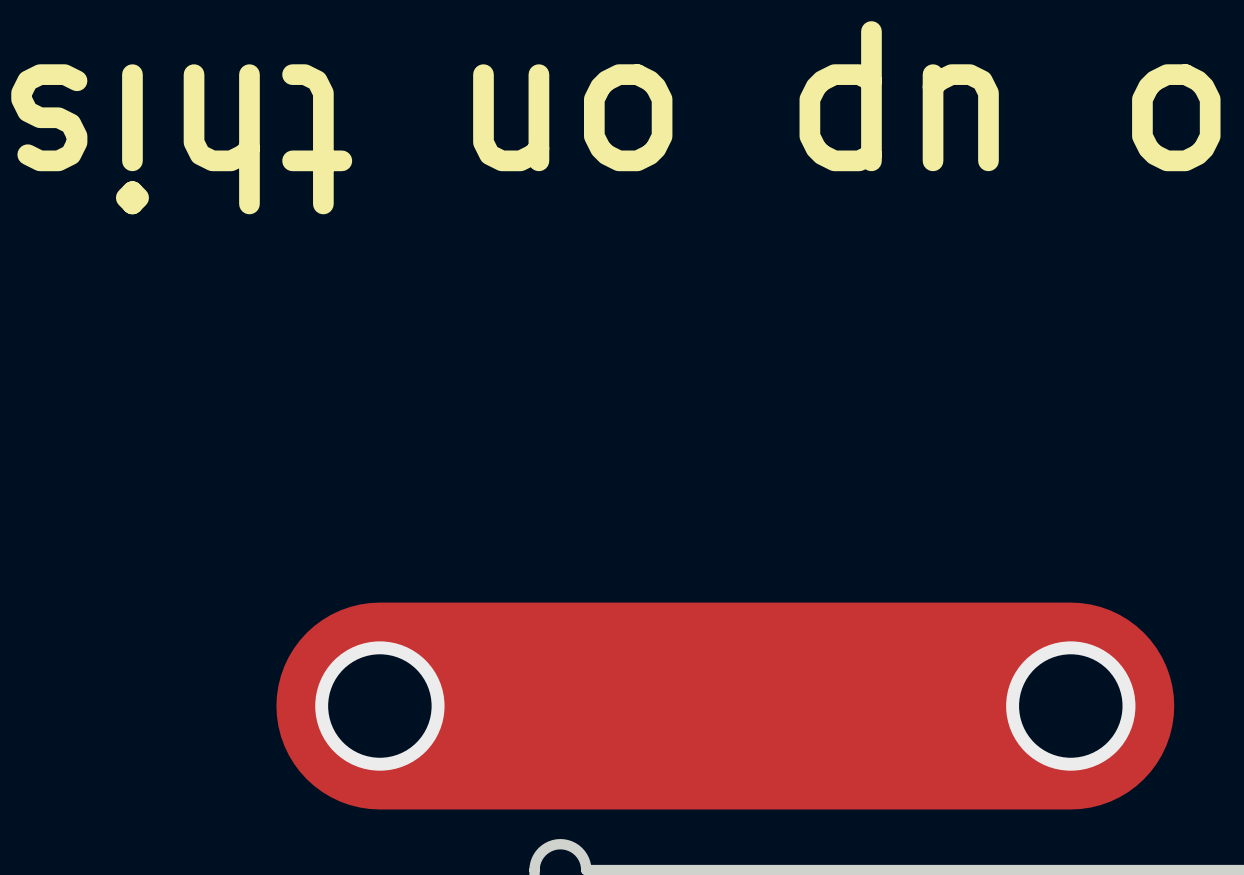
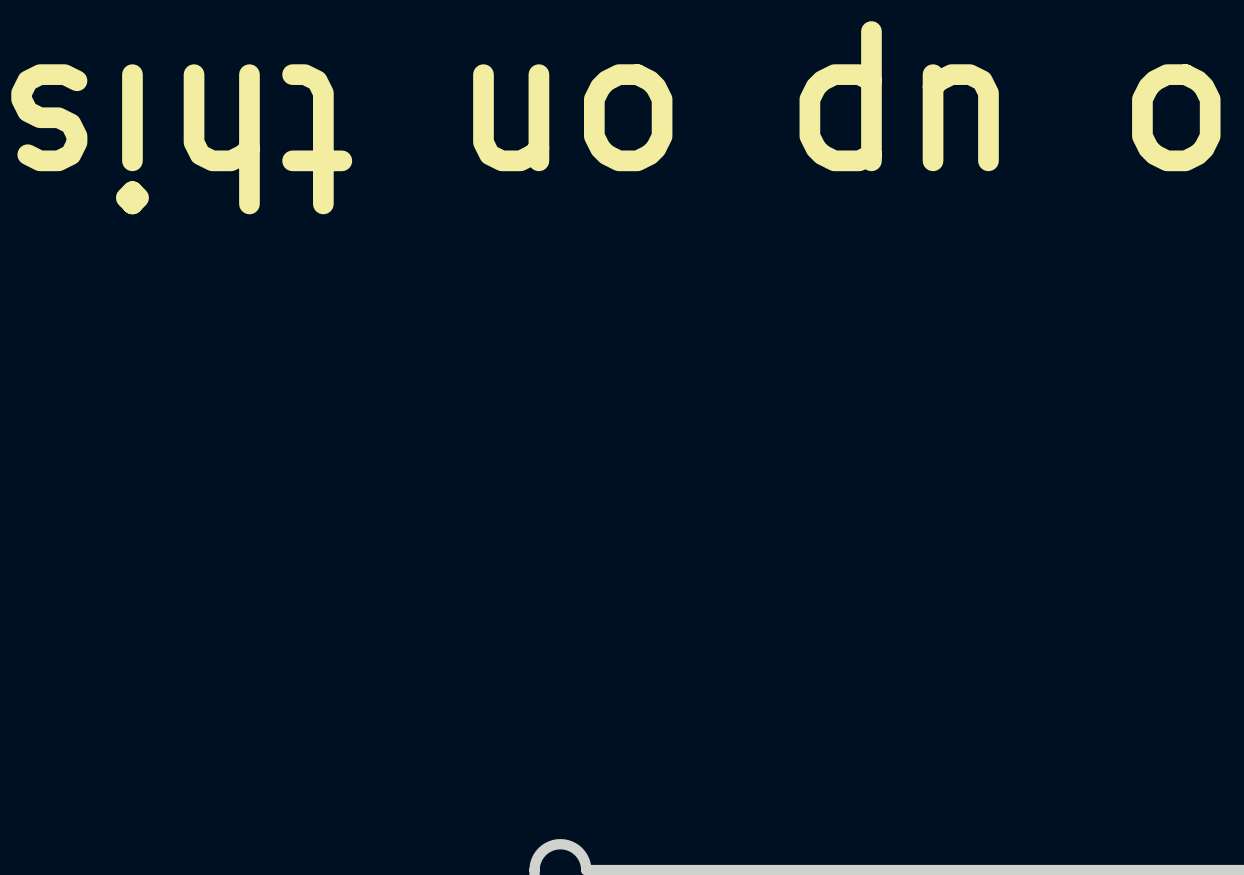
track: (379, 706) (1070, 706) -> none
via: (379, 706) -> none
via: (1070, 706) -> none

